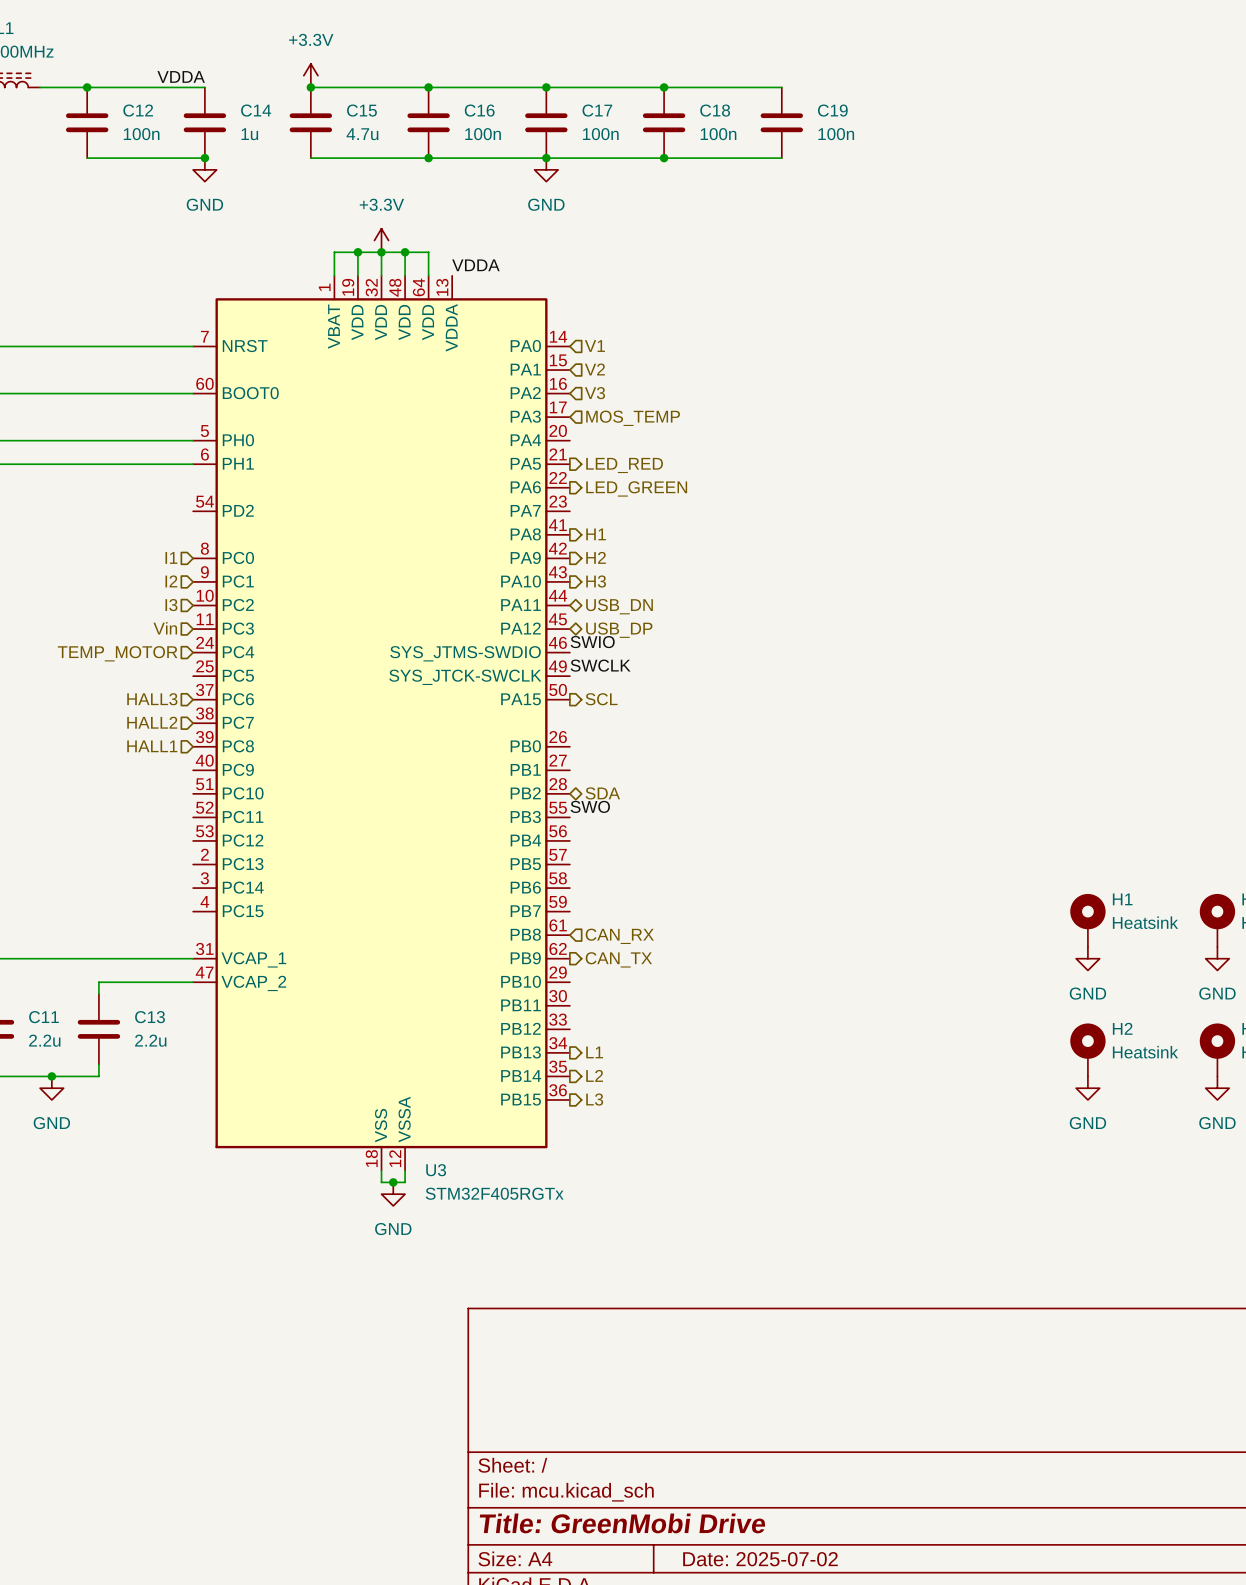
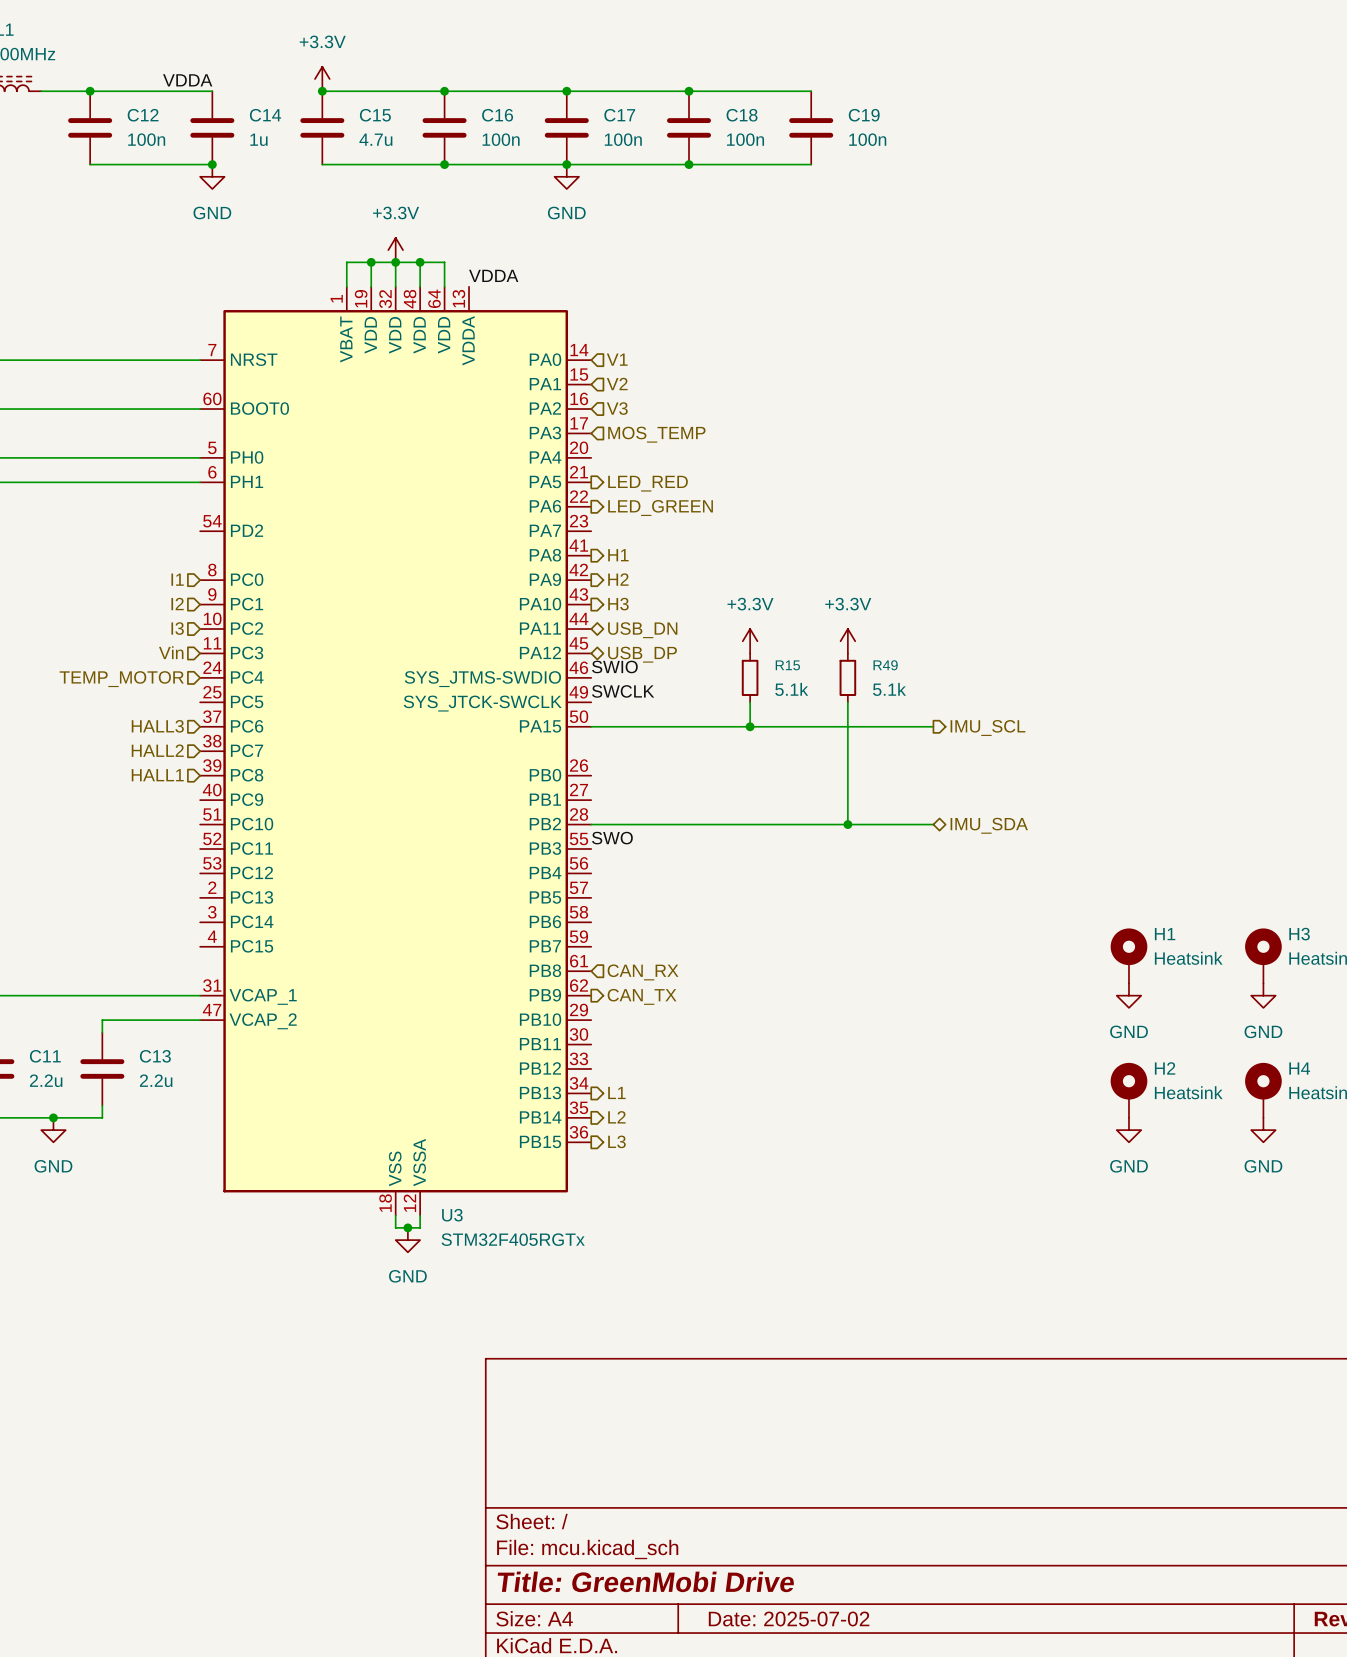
power symbol: none -> +3.3V (750, 641)
power symbol: none -> +3.3V (847, 641)
R15: none -> 5.1k (750, 677)
R49: none -> 5.1k (847, 677)
wire: none -> (750, 702) (750, 726)
wire: none -> (847, 702) (847, 824)
wire: none -> (591, 726) (933, 726)
hierarchical label: SCL (601, 699) -> none
junction: none -> (750, 726)
hierarchical label: none -> IMU_SCL (987, 728)
wire: none -> (591, 824) (933, 824)
hierarchical label: SDA (602, 793) -> none
junction: none -> (847, 824)
hierarchical label: none -> IMU_SDA (989, 825)

